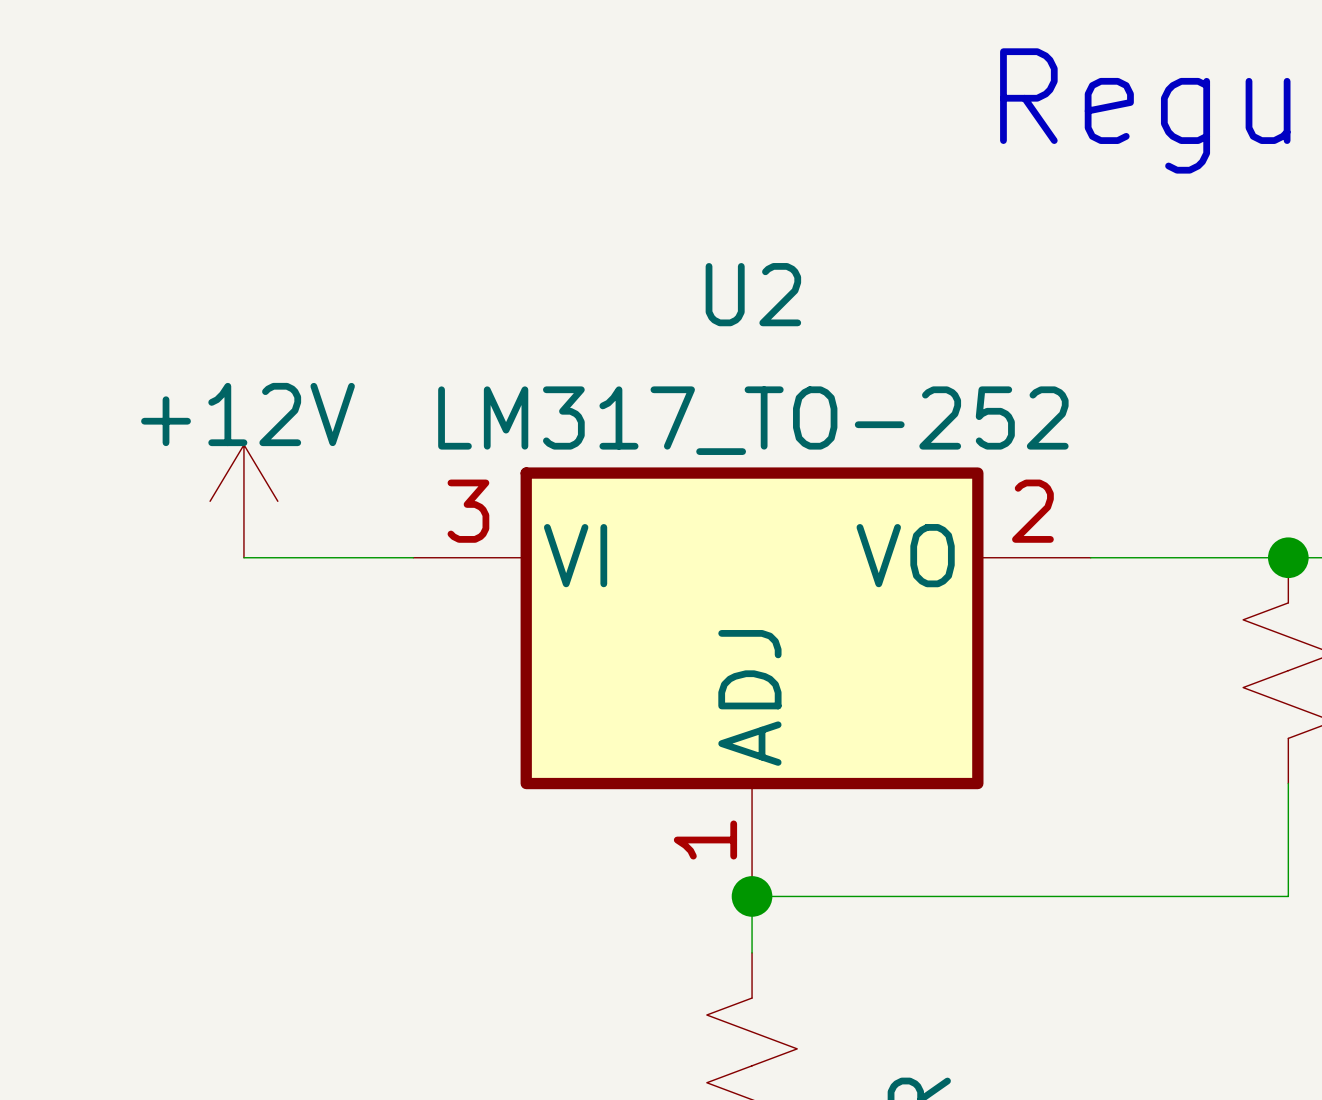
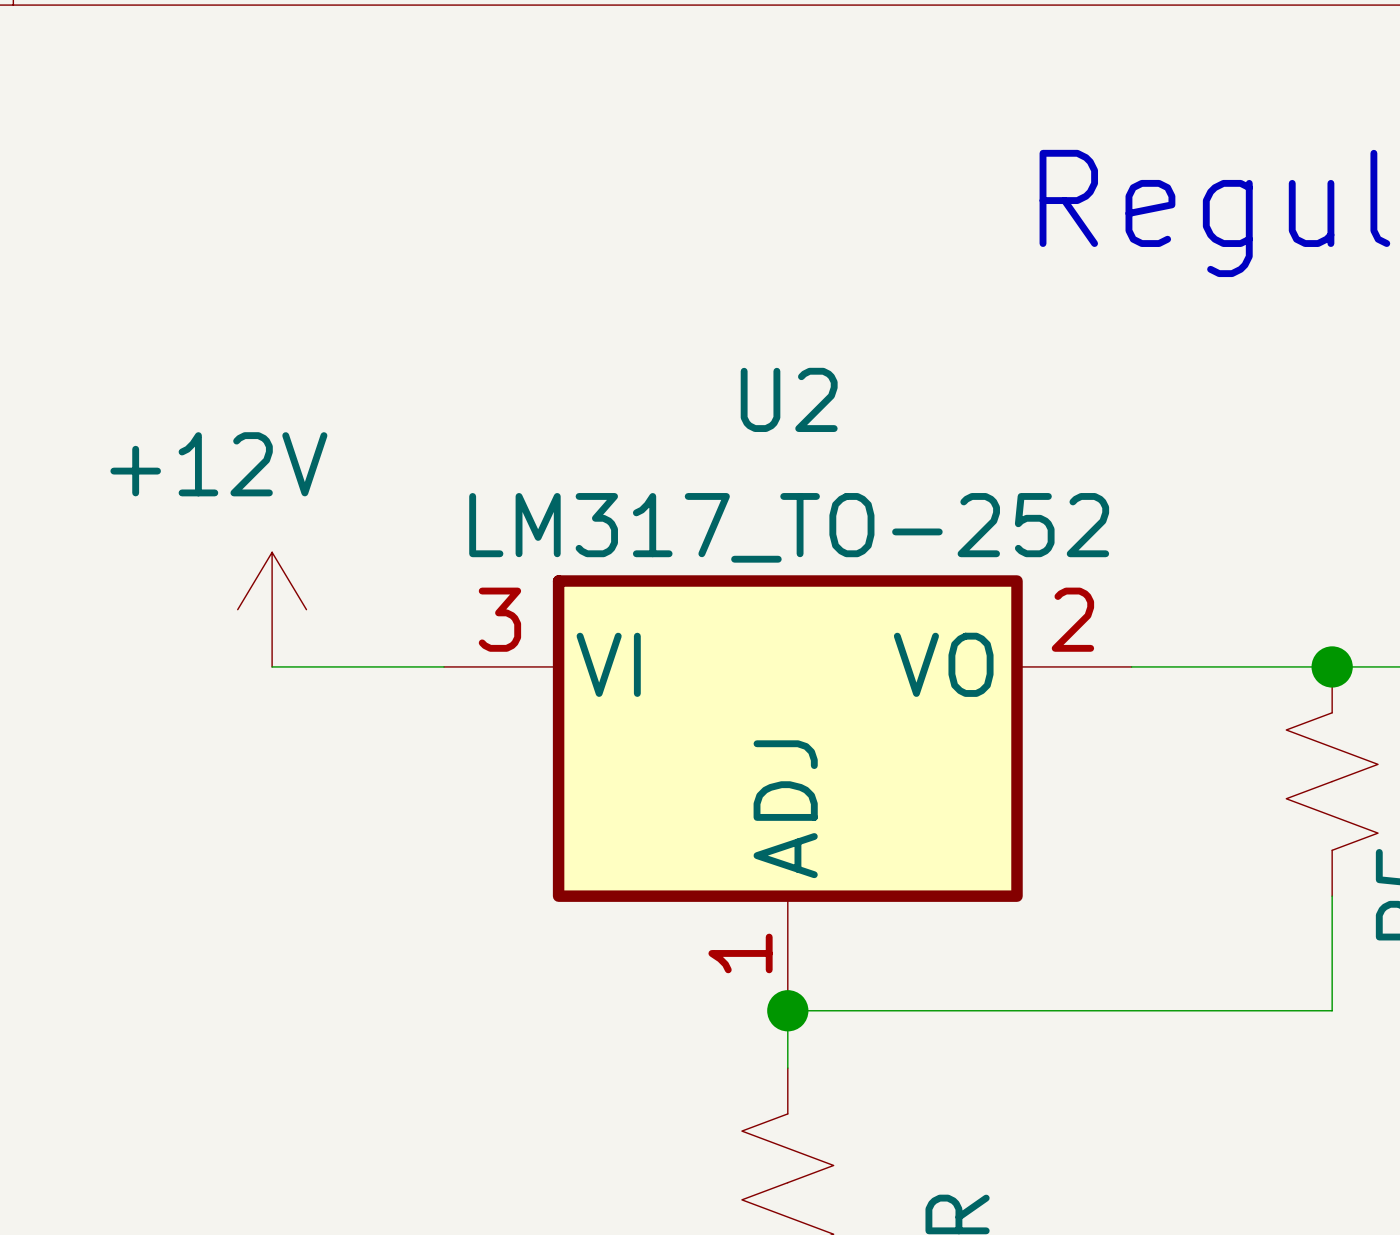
power symbol text position: +12V (248, 414) -> +12V (218, 464)

